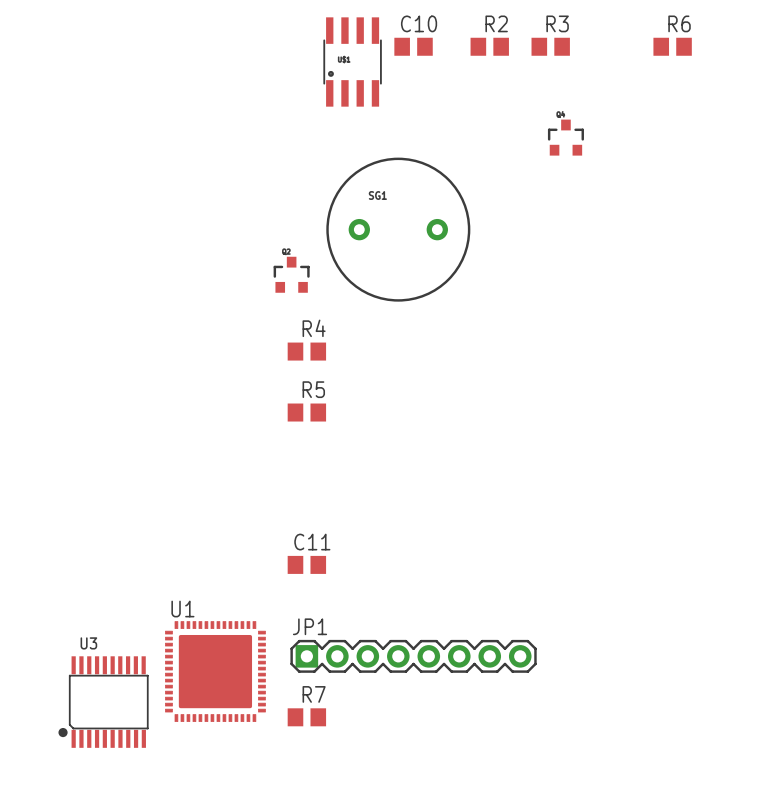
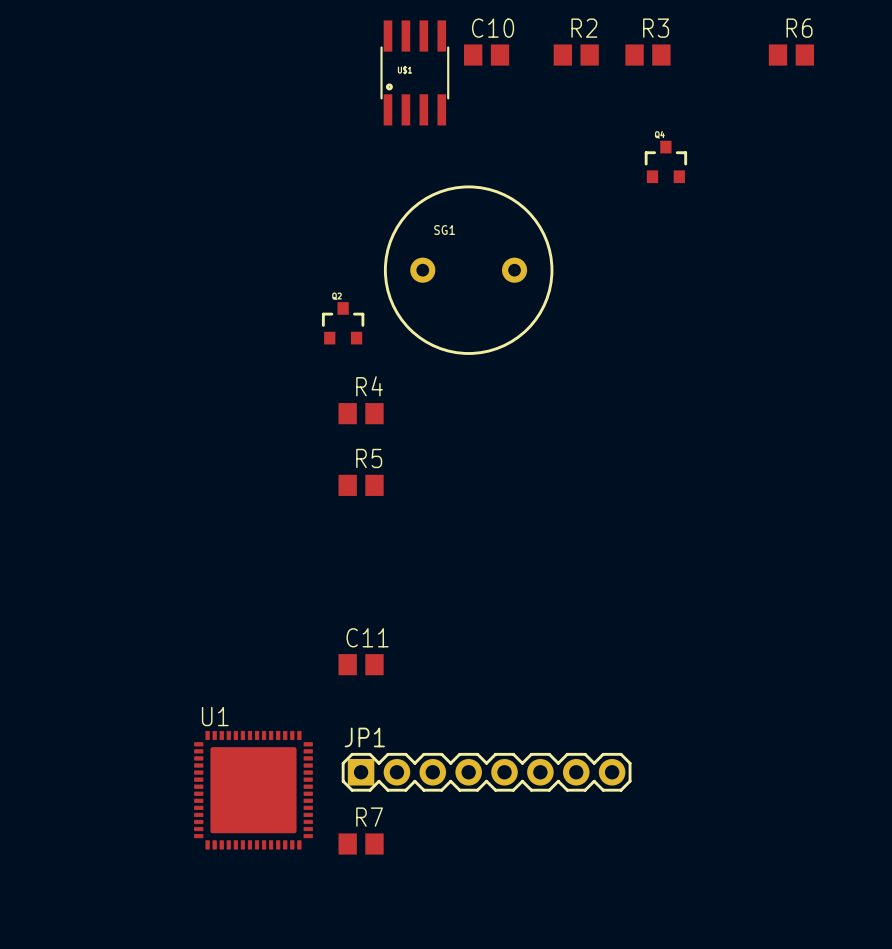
U3: (103, 702) -> none

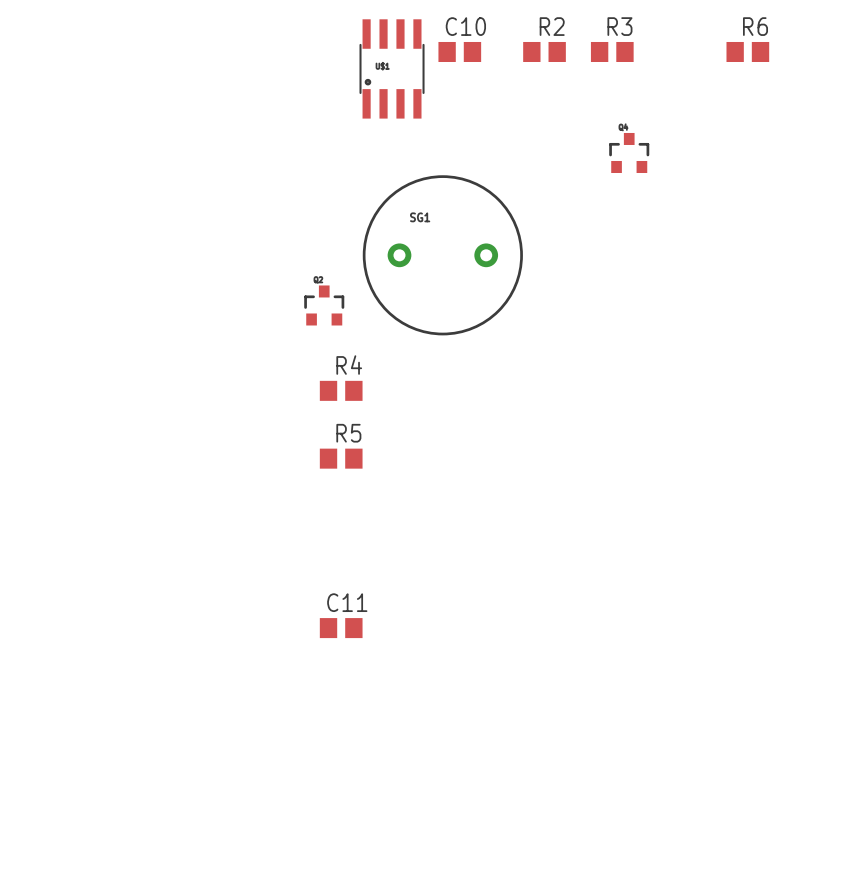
JP1: (486, 772) -> none
U1: (253, 790) -> none
R7: (361, 843) -> none

